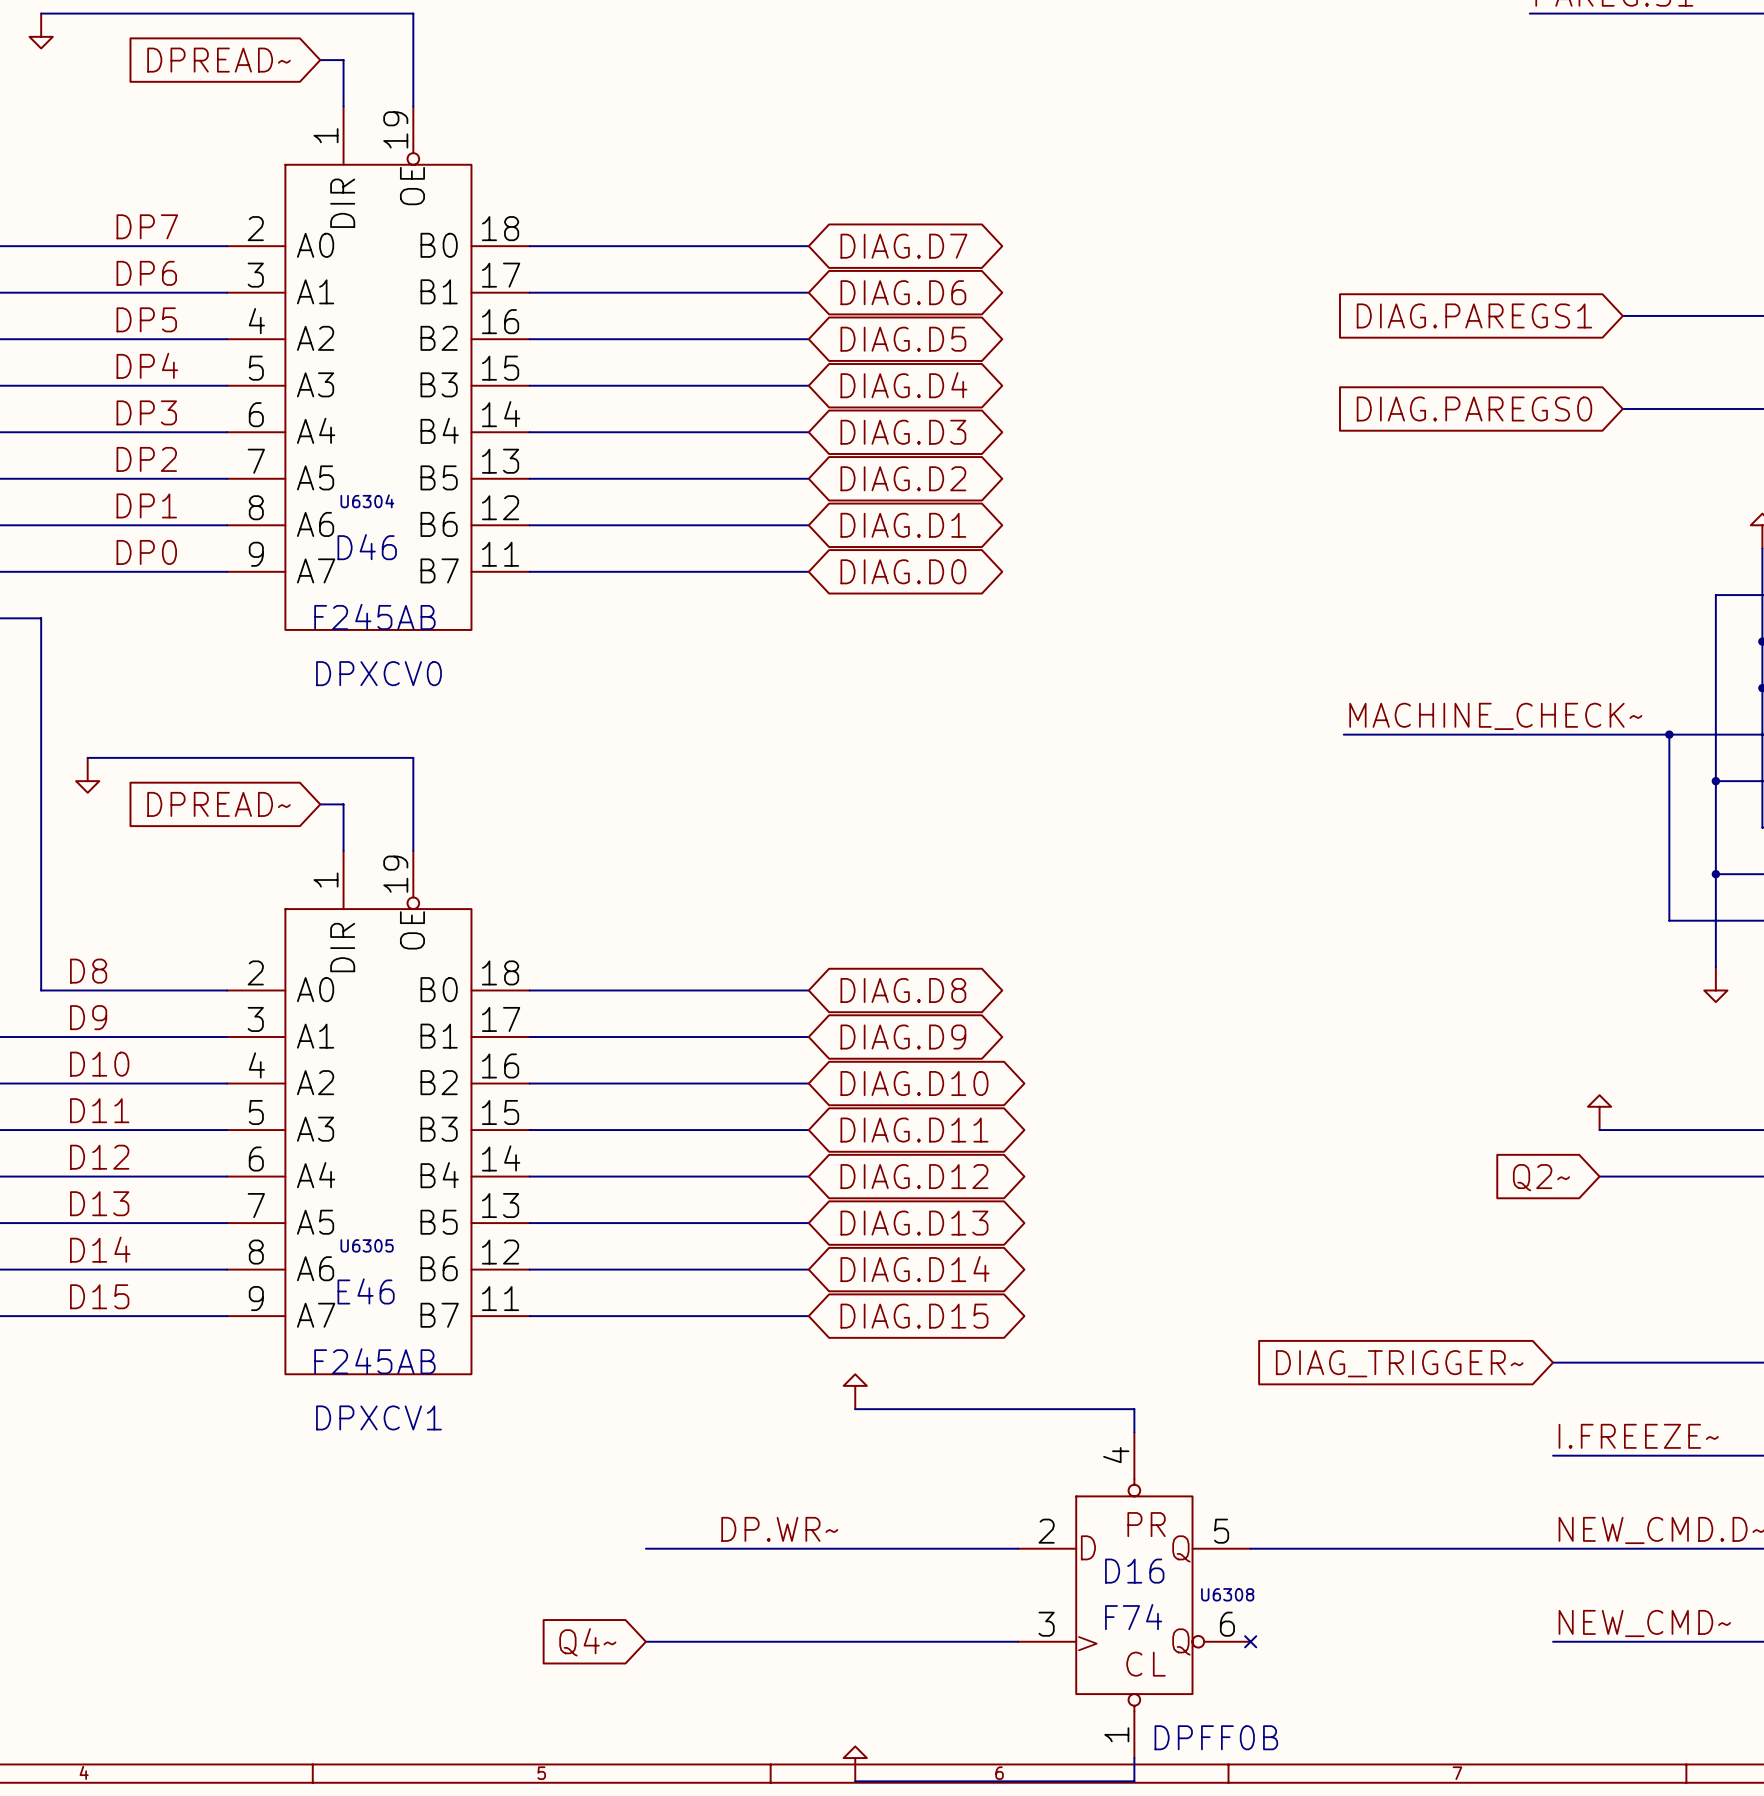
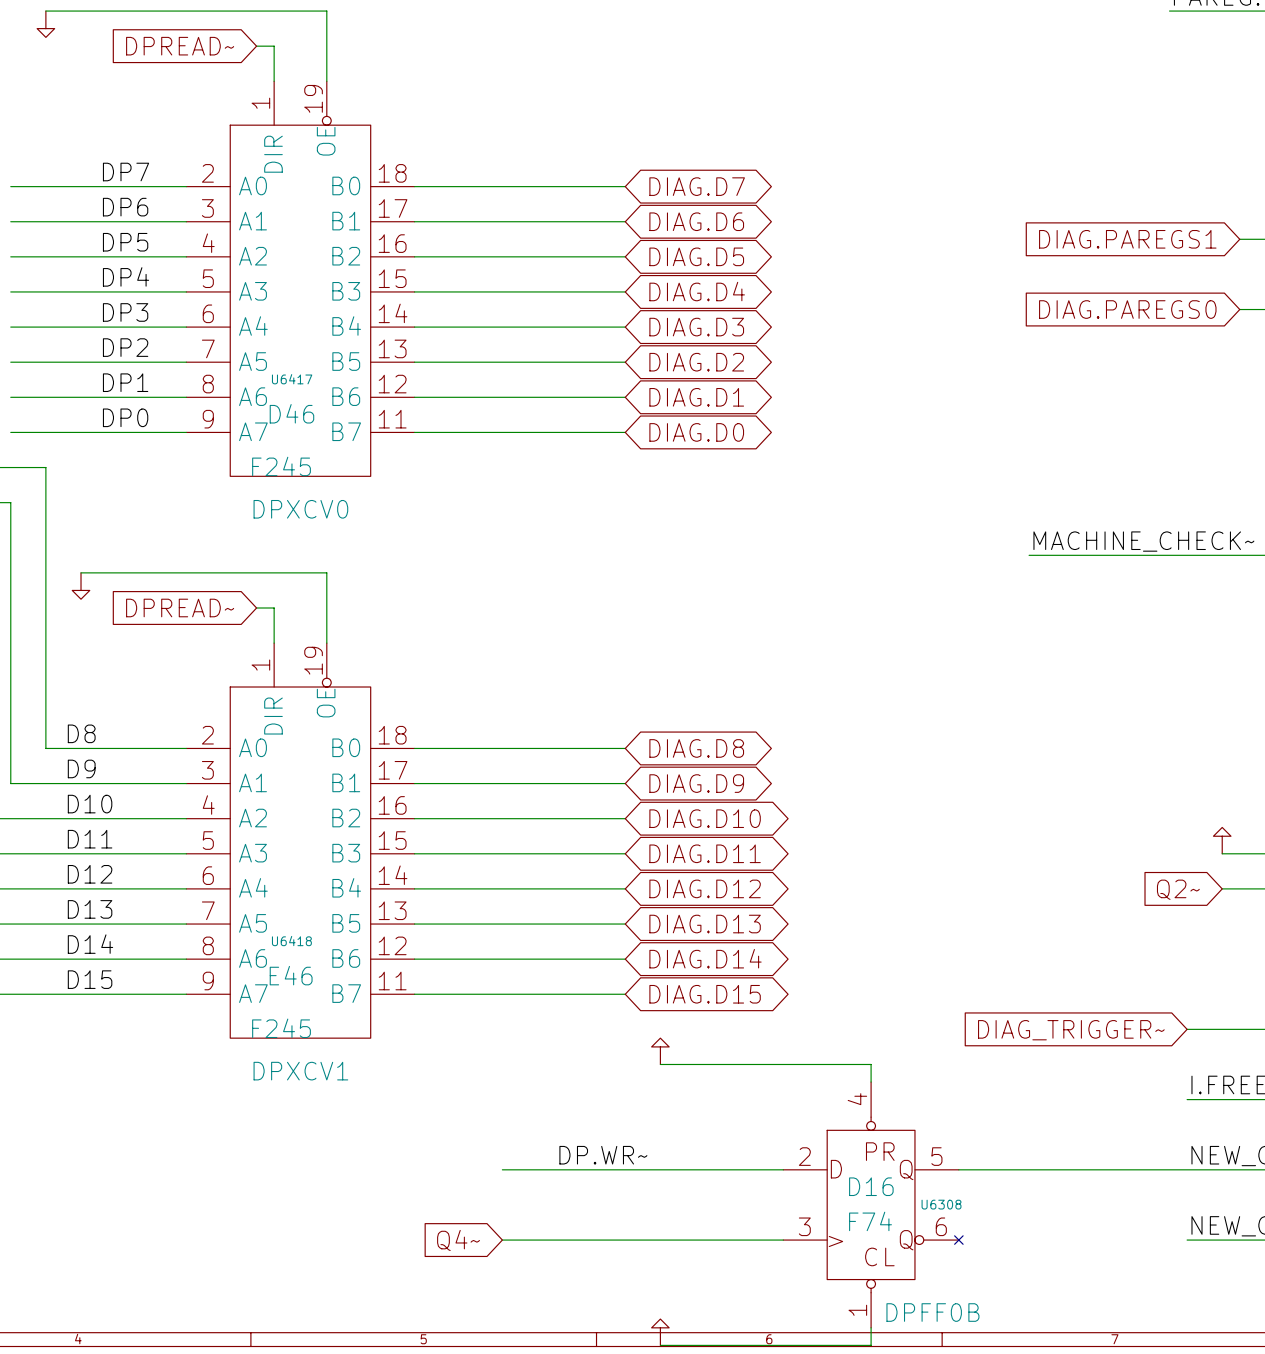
U6304 name: U6304 (367, 501) -> U6417 (292, 379)
U6304 value: F245AB (374, 616) -> F245 (281, 466)
U6305 name: U6305 (367, 1245) -> U6418 (291, 941)
U6305 value: F245AB (374, 1361) -> F245 (281, 1028)

